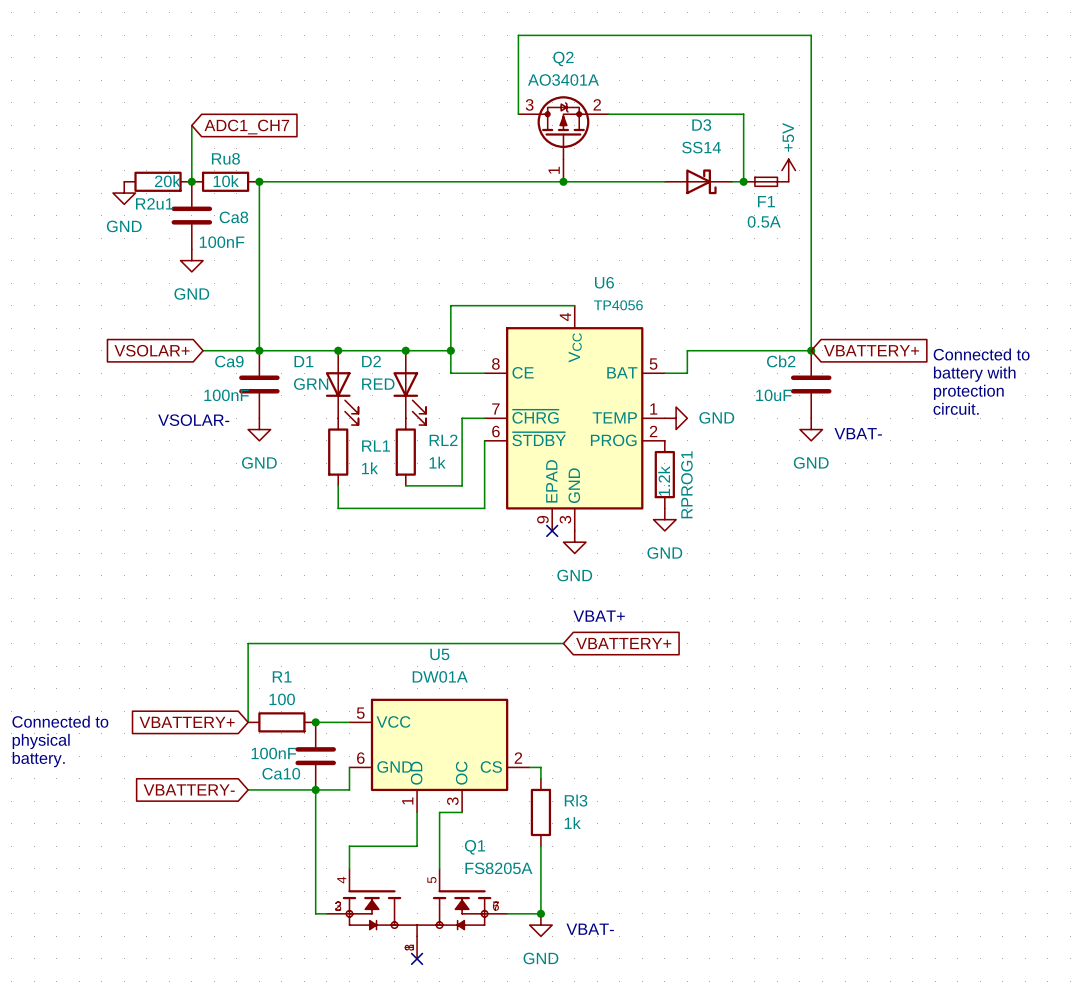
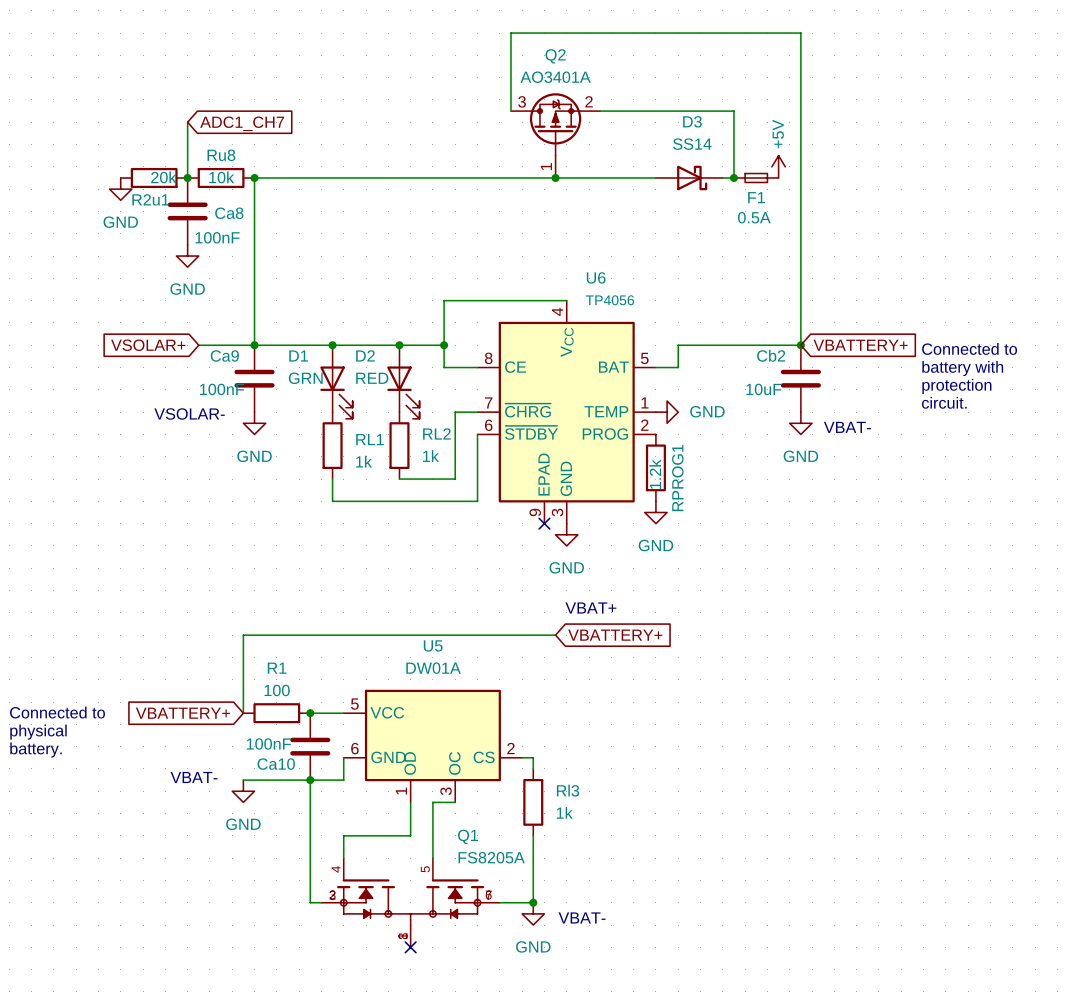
text: none -> VBAT- (193, 777)
global label: VBATTERY- (189, 789) -> none
power symbol: none -> GND (243, 791)

